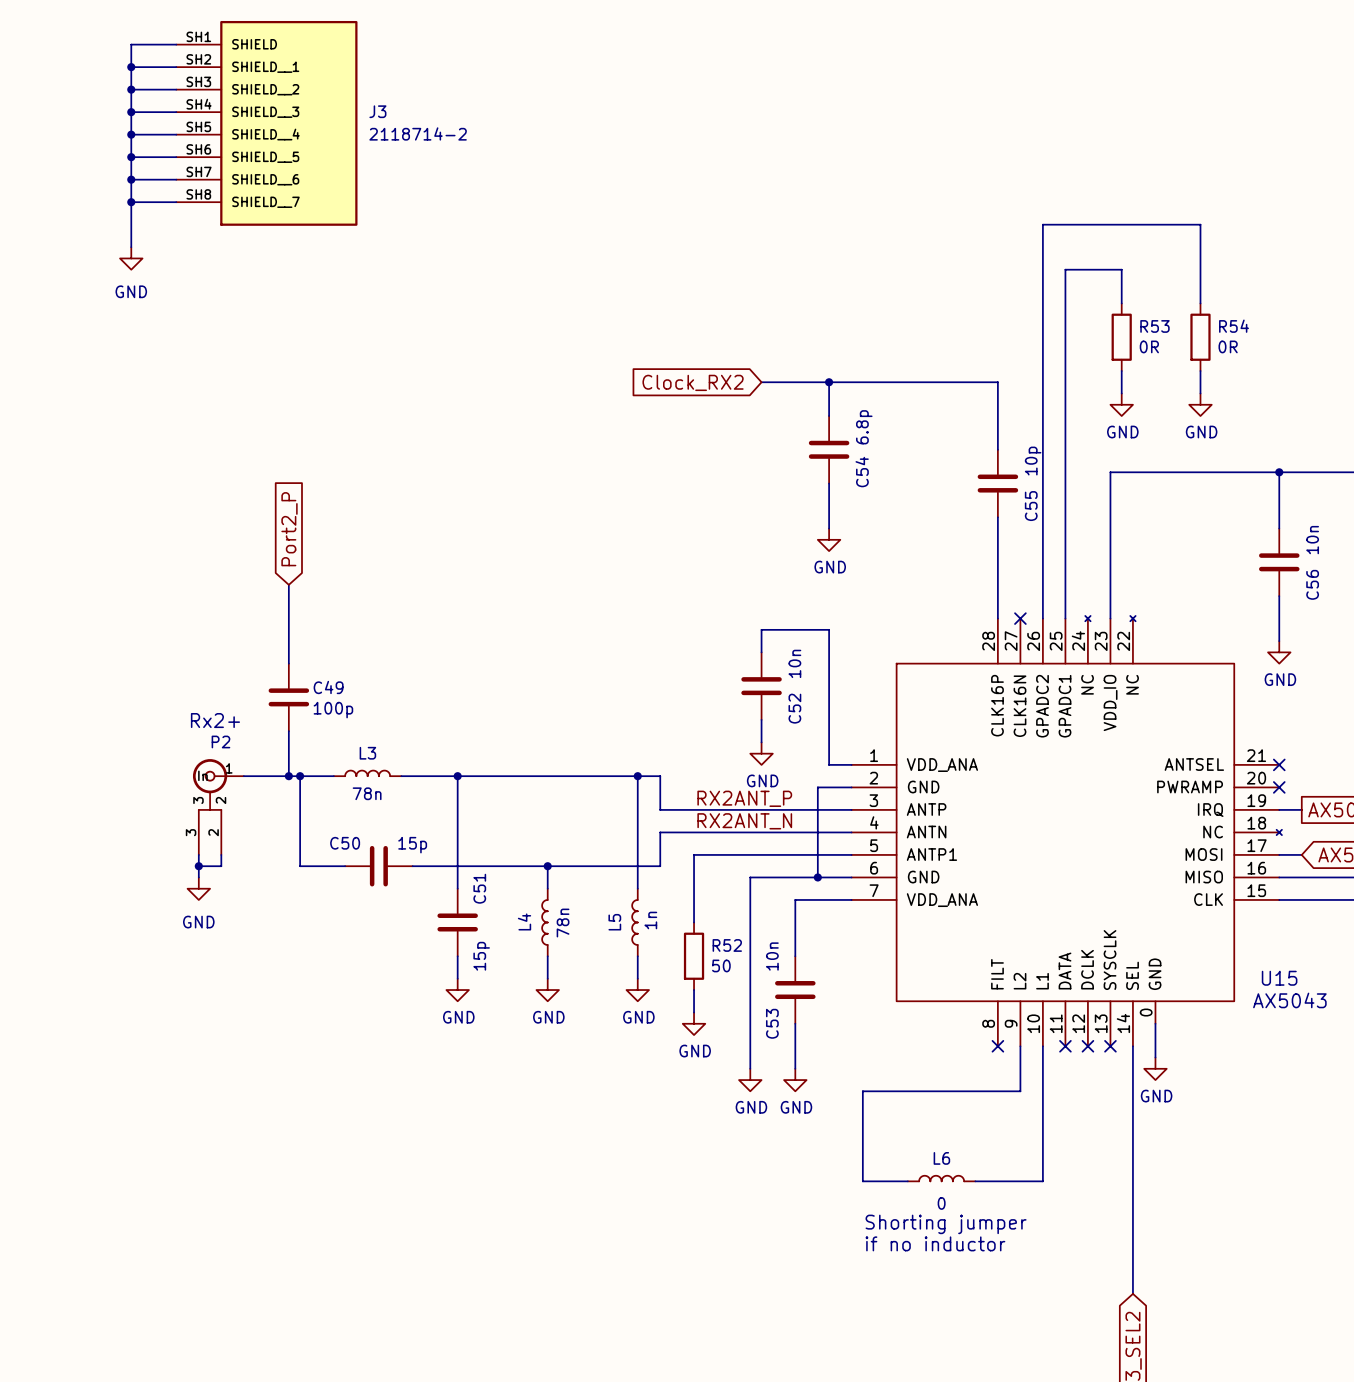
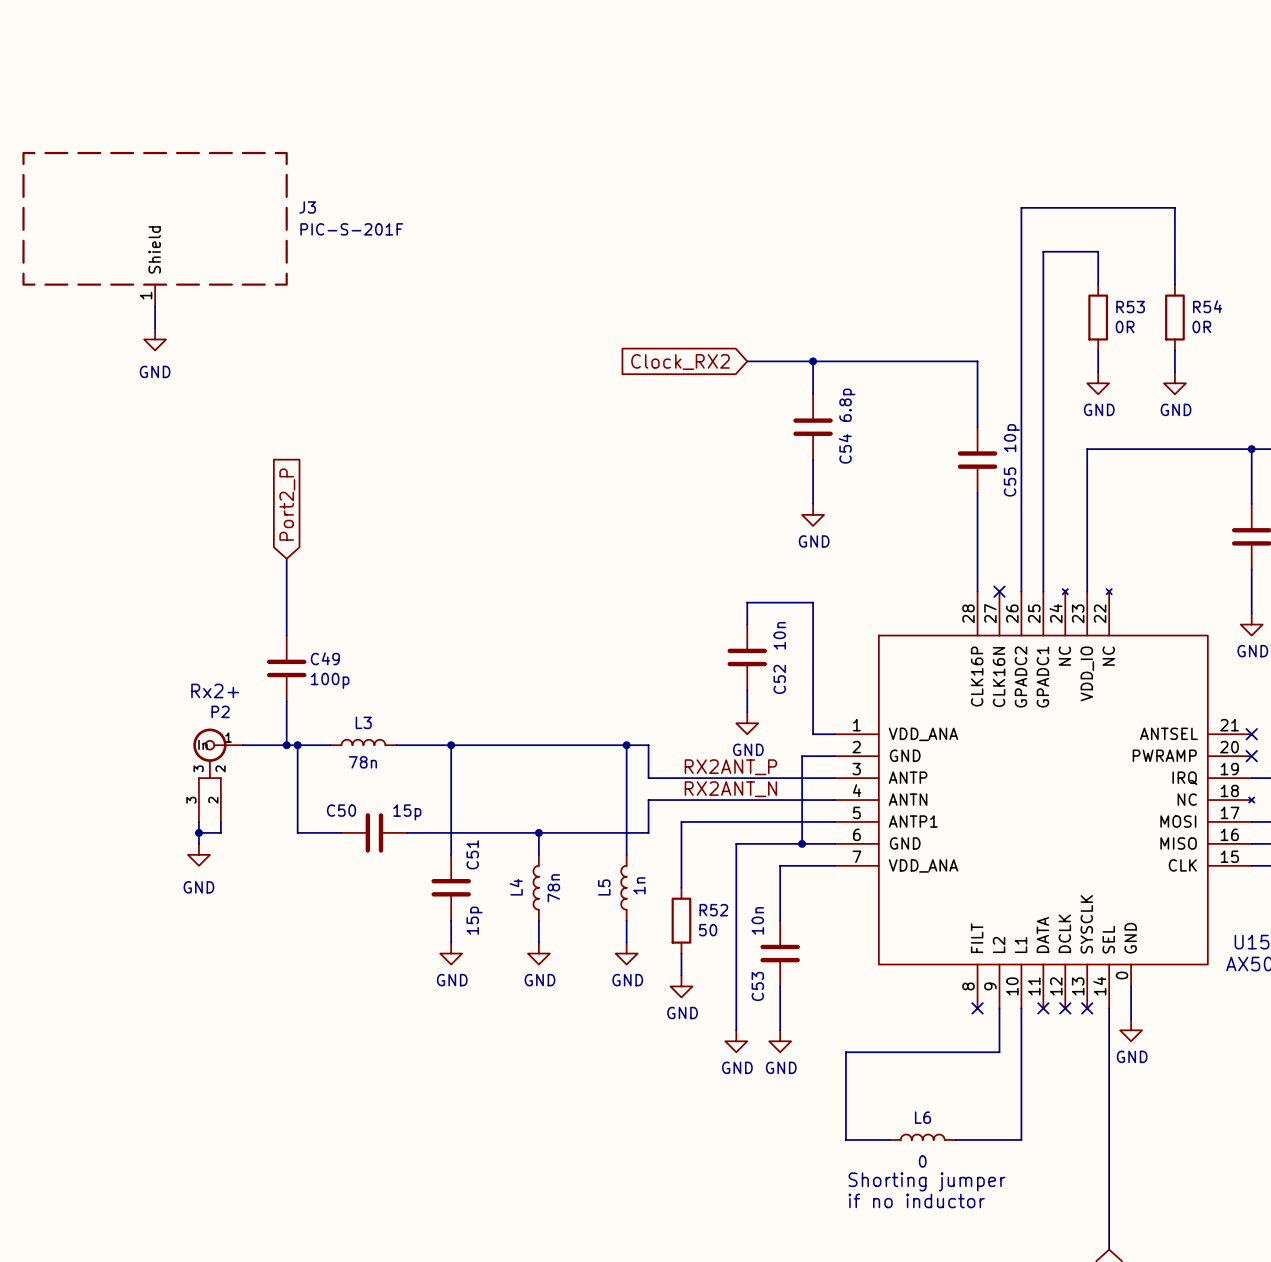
J3 symbol: [176, 20, 358, 226] -> [22, 151, 288, 307]
wire: (176, 44) (131, 44) (131, 247) -> none
wire: (131, 67) (176, 67) -> none
junction: (131, 67) -> none
wire: (131, 89) (176, 89) -> none
junction: (131, 89) -> none
J3 name position: J3 (377, 111) -> J3 (307, 207)
wire: (131, 112) (176, 112) -> none
junction: (131, 112) -> none
J3 value: 2118714-2 (418, 133) -> PIC-S-201F (351, 229)
wire: (131, 134) (176, 134) -> none
junction: (131, 134) -> none
wire: (131, 157) (176, 157) -> none
junction: (131, 157) -> none
wire: (131, 179) (176, 179) -> none
junction: (131, 179) -> none
wire: (131, 202) (176, 202) -> none
junction: (131, 202) -> none
power symbol position: GND (131, 258) -> GND (155, 339)
wire: none -> (155, 306) (155, 328)

